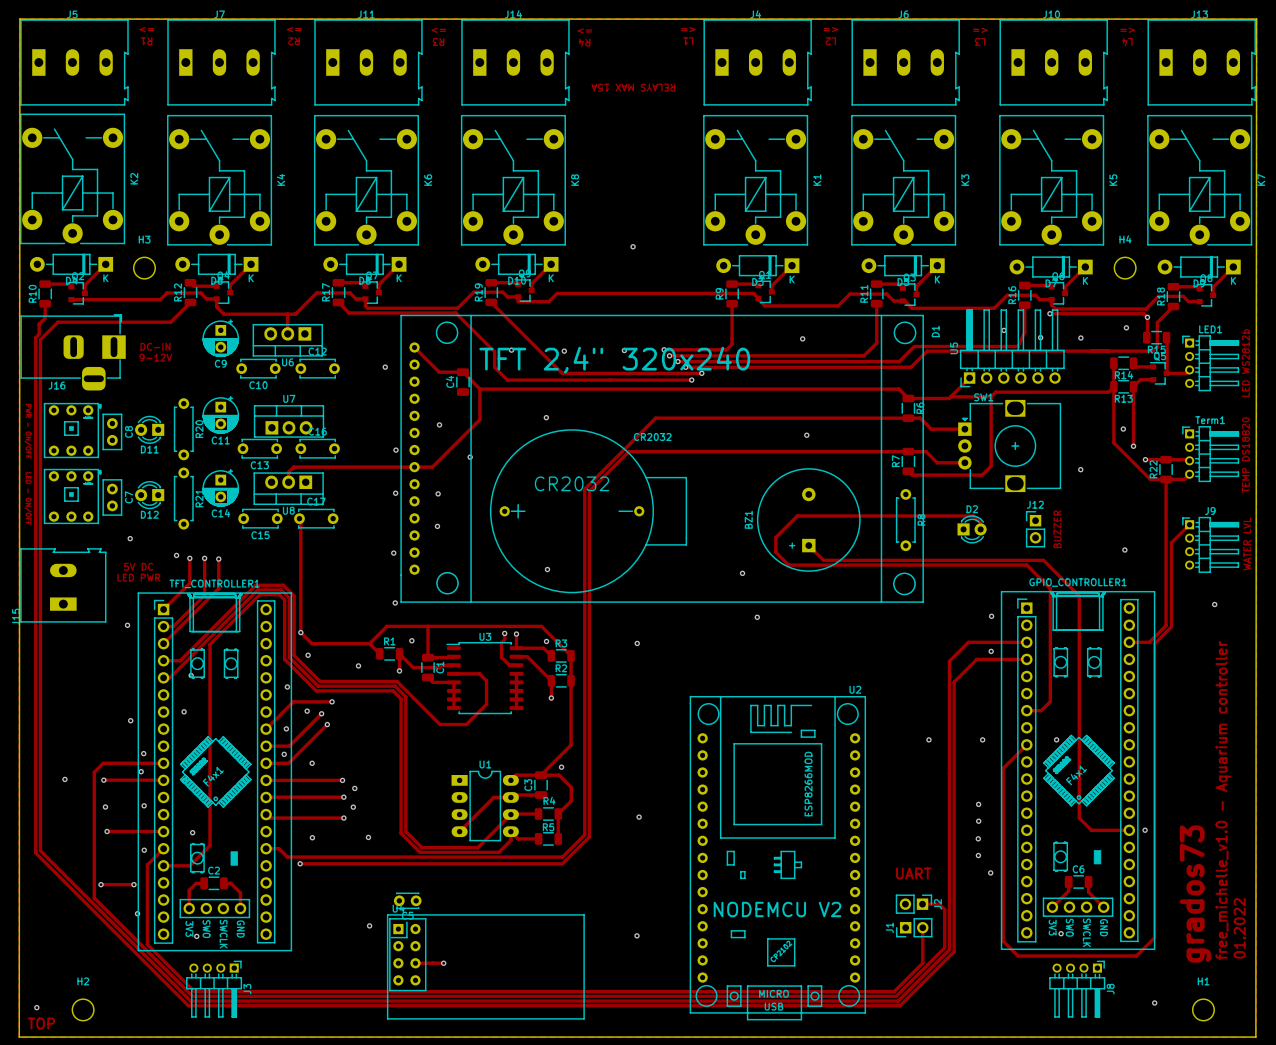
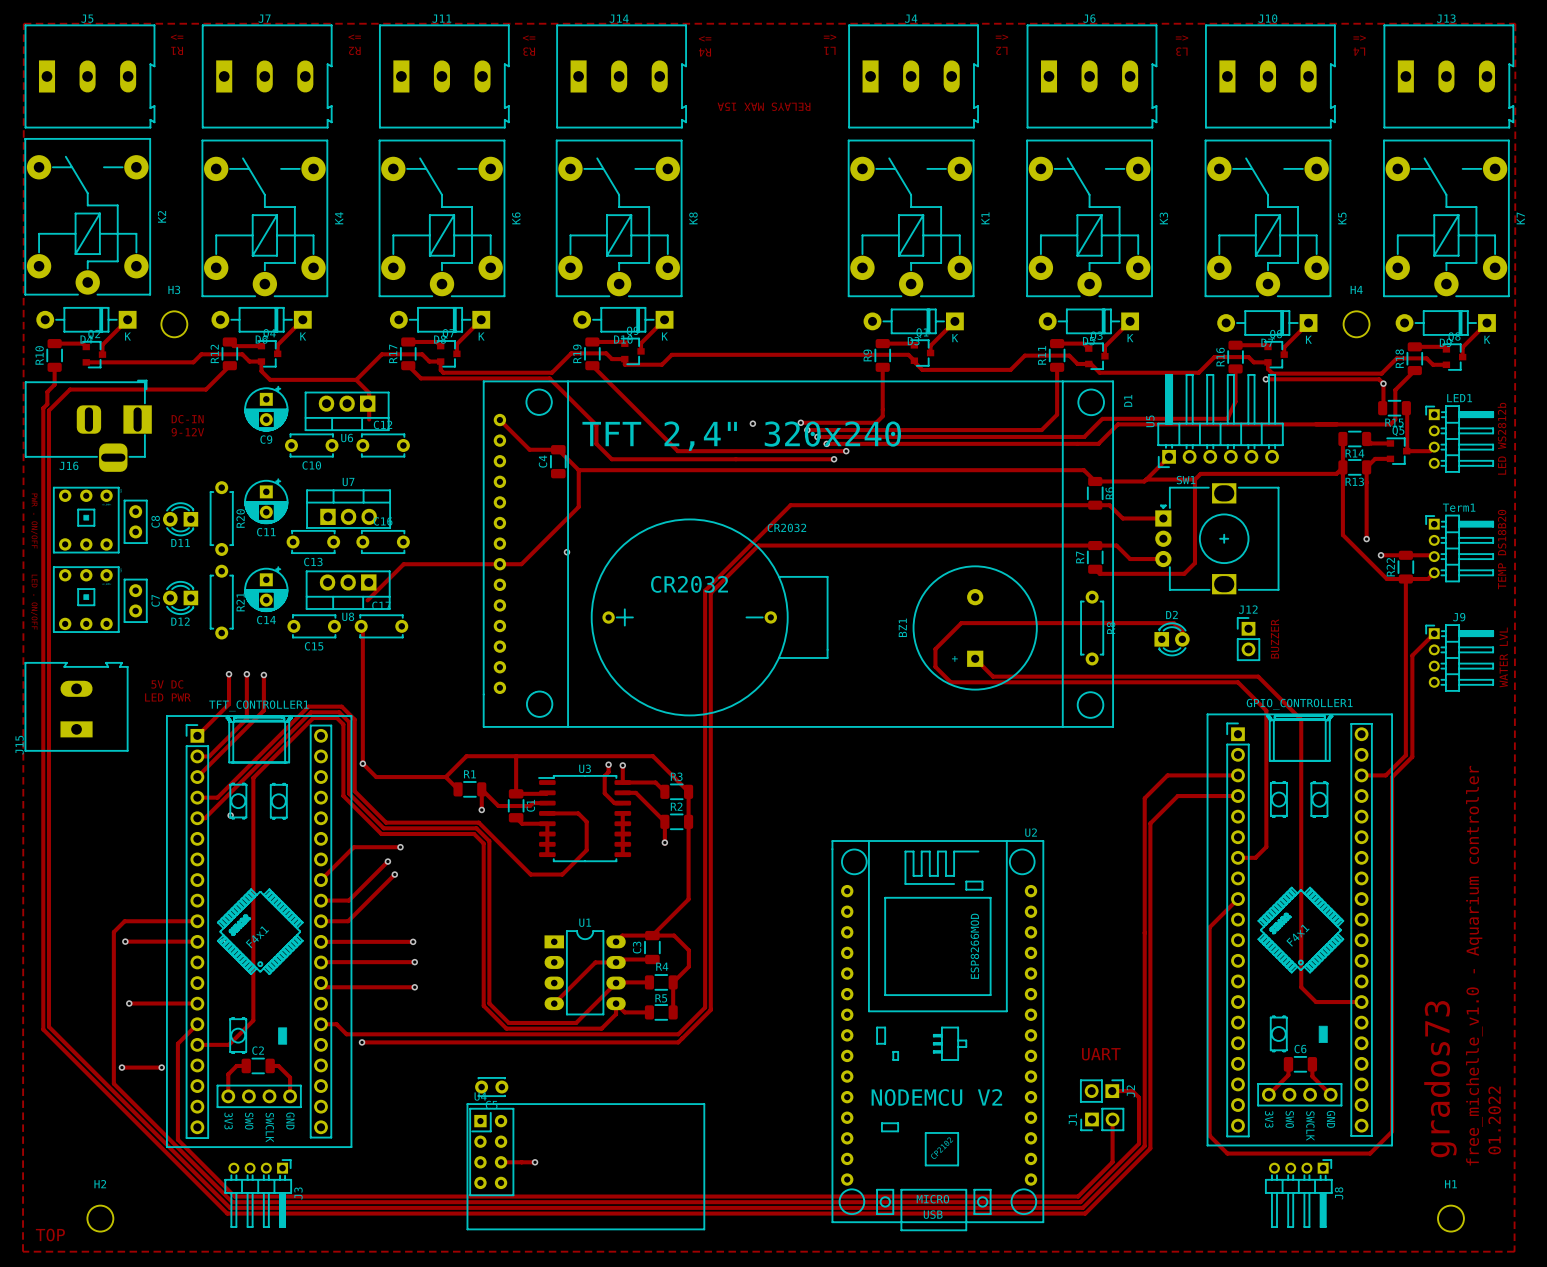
board edge: (19, 19) (1256, 19) (1255, 1037) (19, 1037) (19, 19) -> none
via: (633, 246) -> none
track: (287, 314) (287, 333) -> none
track: none -> (356, 379) (369, 392) (369, 419)
via: (1126, 327) -> none
via: (1003, 330) -> none
via: (1040, 337) -> none
via: (802, 338) -> none
via: (1080, 338) -> none
via: (511, 350) -> none
via: (564, 351) -> none
via: (385, 367) -> none
via: (546, 417) -> none
via: (439, 424) -> none
via: (1123, 429) -> none
via: (806, 435) -> none
via: (395, 450) -> none
track: (334, 467) (293, 467) (288, 472) (288, 482) -> (403, 564) (367, 600)
via: (1080, 469) -> none
via: (395, 493) -> none
via: (438, 493) -> none
via: (437, 526) -> none
via: (130, 538) -> none
via: (1124, 550) -> none
via: (393, 553) -> none
via: (176, 555) -> none
via: (547, 569) -> none
via: (742, 573) -> none
via: (395, 602) -> none
via: (1214, 604) -> none
via: (991, 616) -> none
via: (757, 617) -> none
via: (127, 625) -> none
via: (411, 640) -> none
via: (546, 641) -> none
via: (637, 643) -> none
via: (991, 651) -> none
via: (308, 655) -> none
via: (358, 665) -> none
via: (287, 686) -> none
via: (184, 711) -> none
via: (307, 711) -> none
via: (130, 720) -> none
via: (286, 728) -> none
via: (928, 739) -> none
via: (982, 739) -> none
via: (1056, 739) -> none
via: (143, 753) -> none
via: (284, 754) -> none
via: (312, 763) -> none
via: (561, 767) -> none
via: (141, 771) -> none
via: (64, 779) -> none
via: (354, 788) -> none
via: (978, 804) -> none
via: (144, 805) -> none
via: (105, 807) -> none
via: (353, 807) -> none
via: (639, 817) -> none
via: (978, 821) -> none
via: (1145, 830) -> none
via: (192, 832) -> none
via: (312, 837) -> none
via: (368, 837) -> none
via: (978, 838) -> none
via: (144, 850) -> none
via: (978, 855) -> none
via: (990, 872) -> none
via: (137, 913) -> none
via: (369, 925) -> none
via: (1061, 933) -> none
via: (636, 935) -> none
via: (196, 936) -> none
via: (1154, 1003) -> none
via: (36, 1007) -> none

